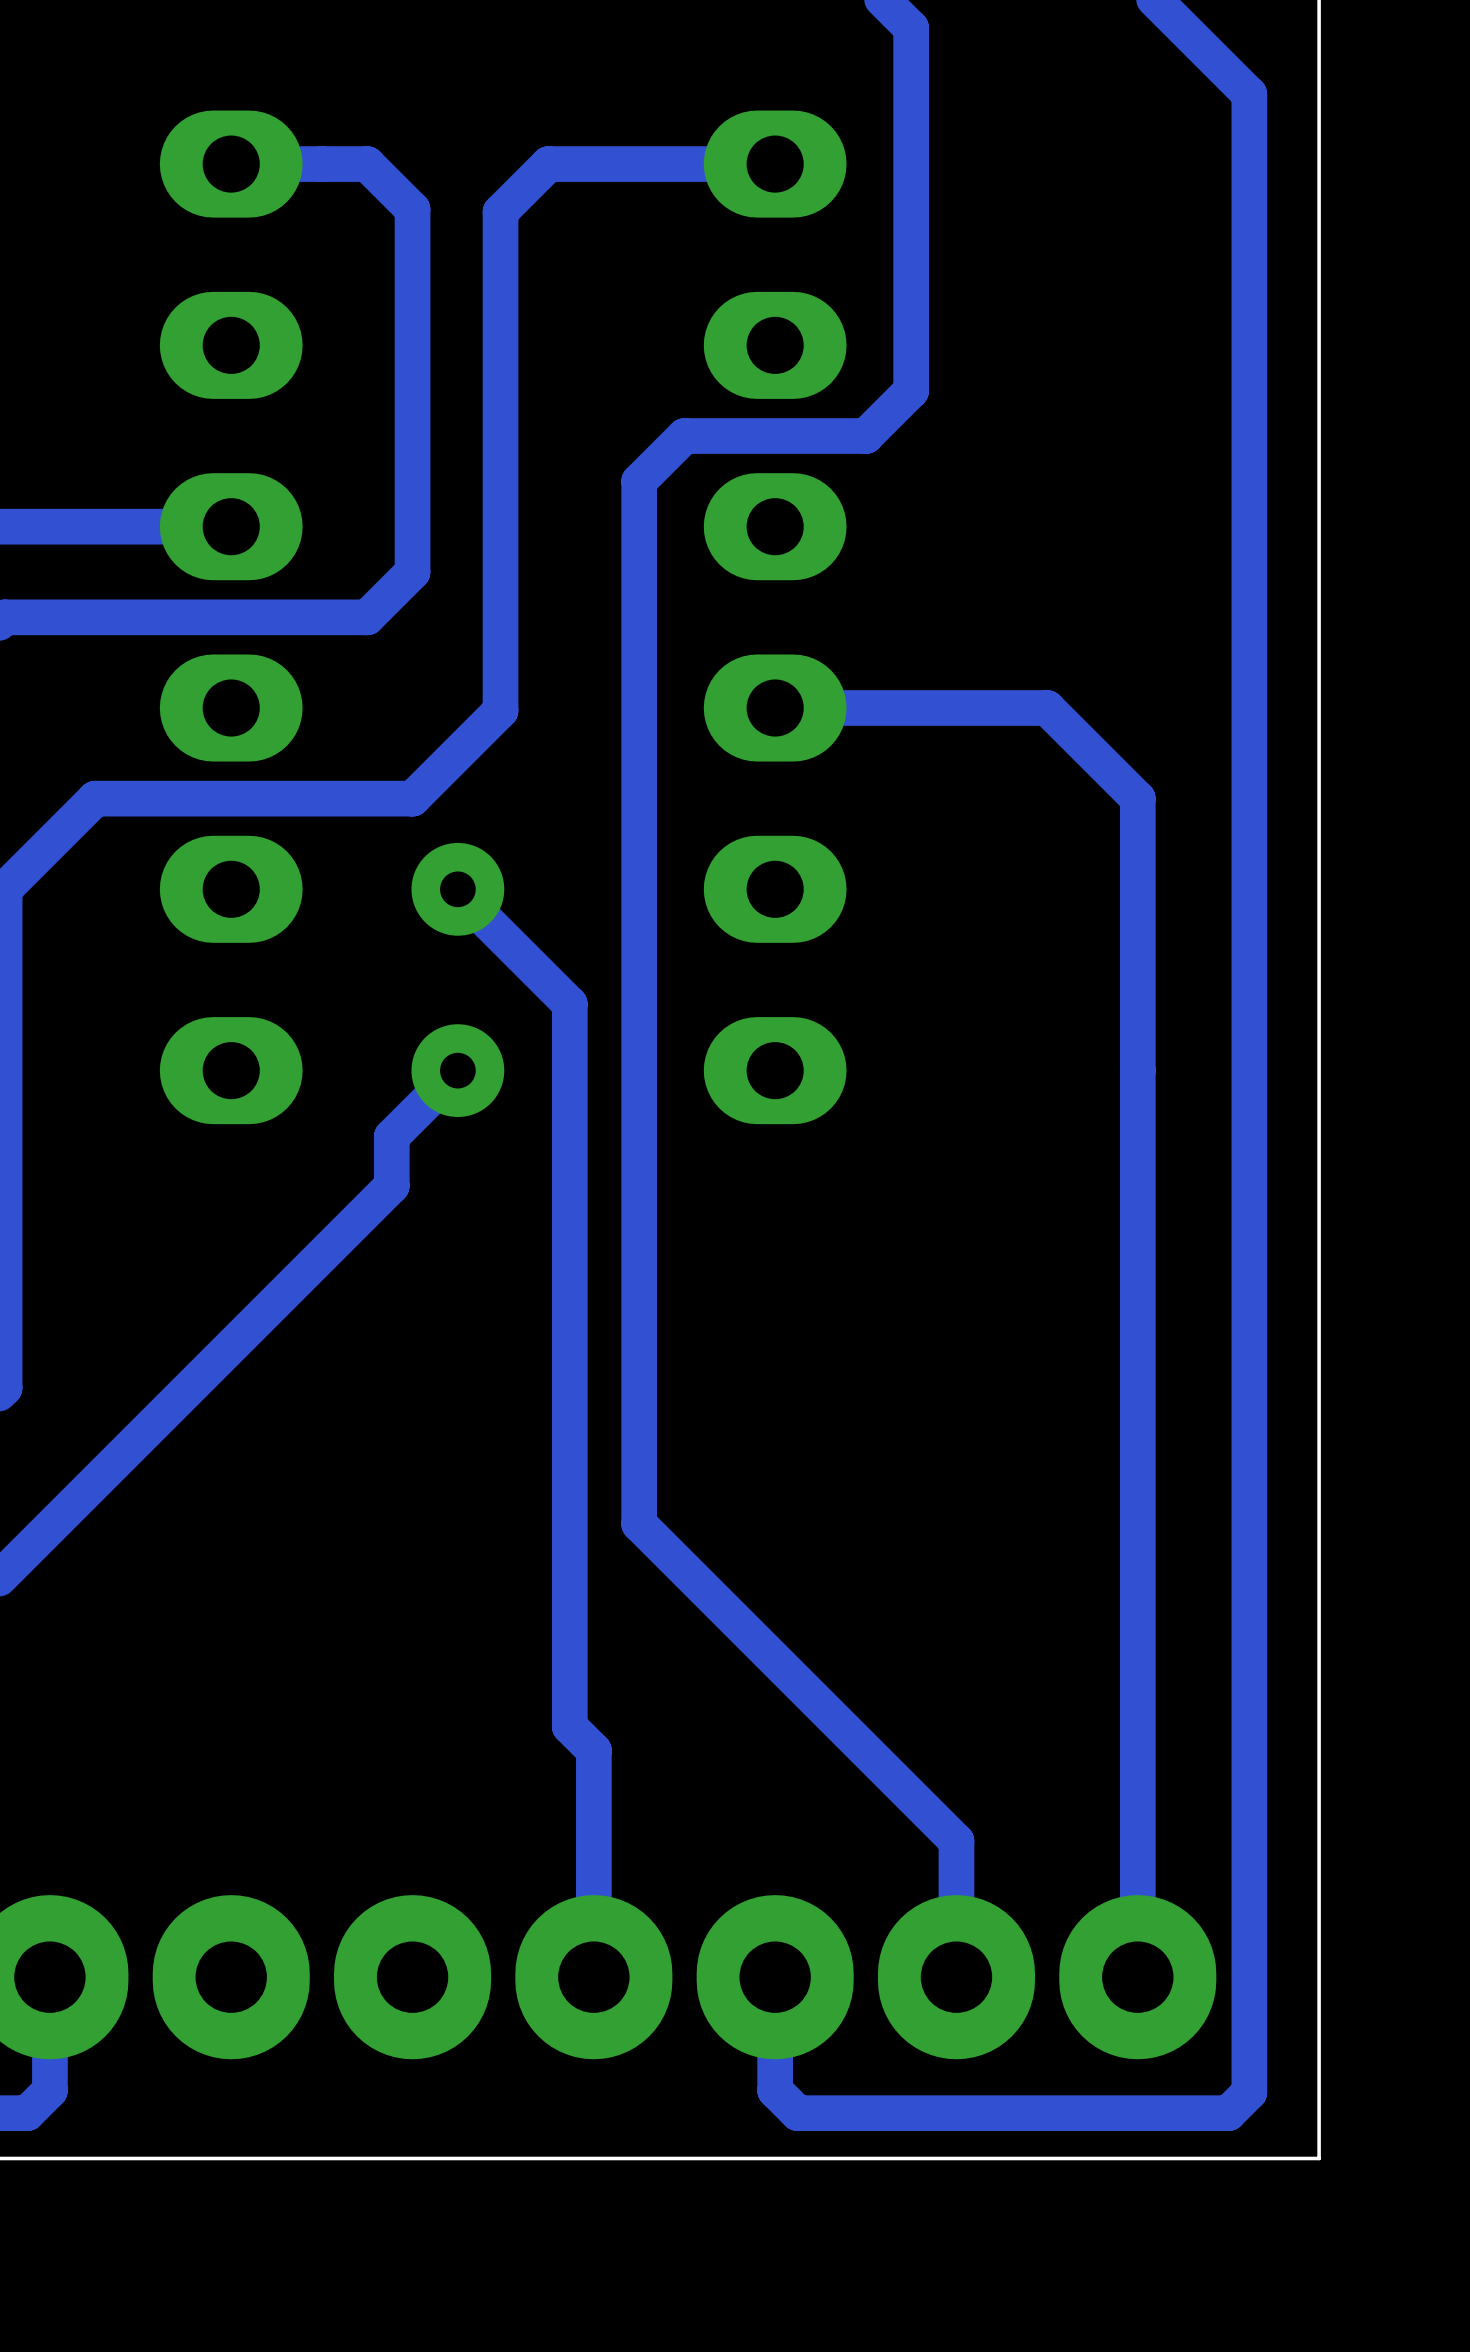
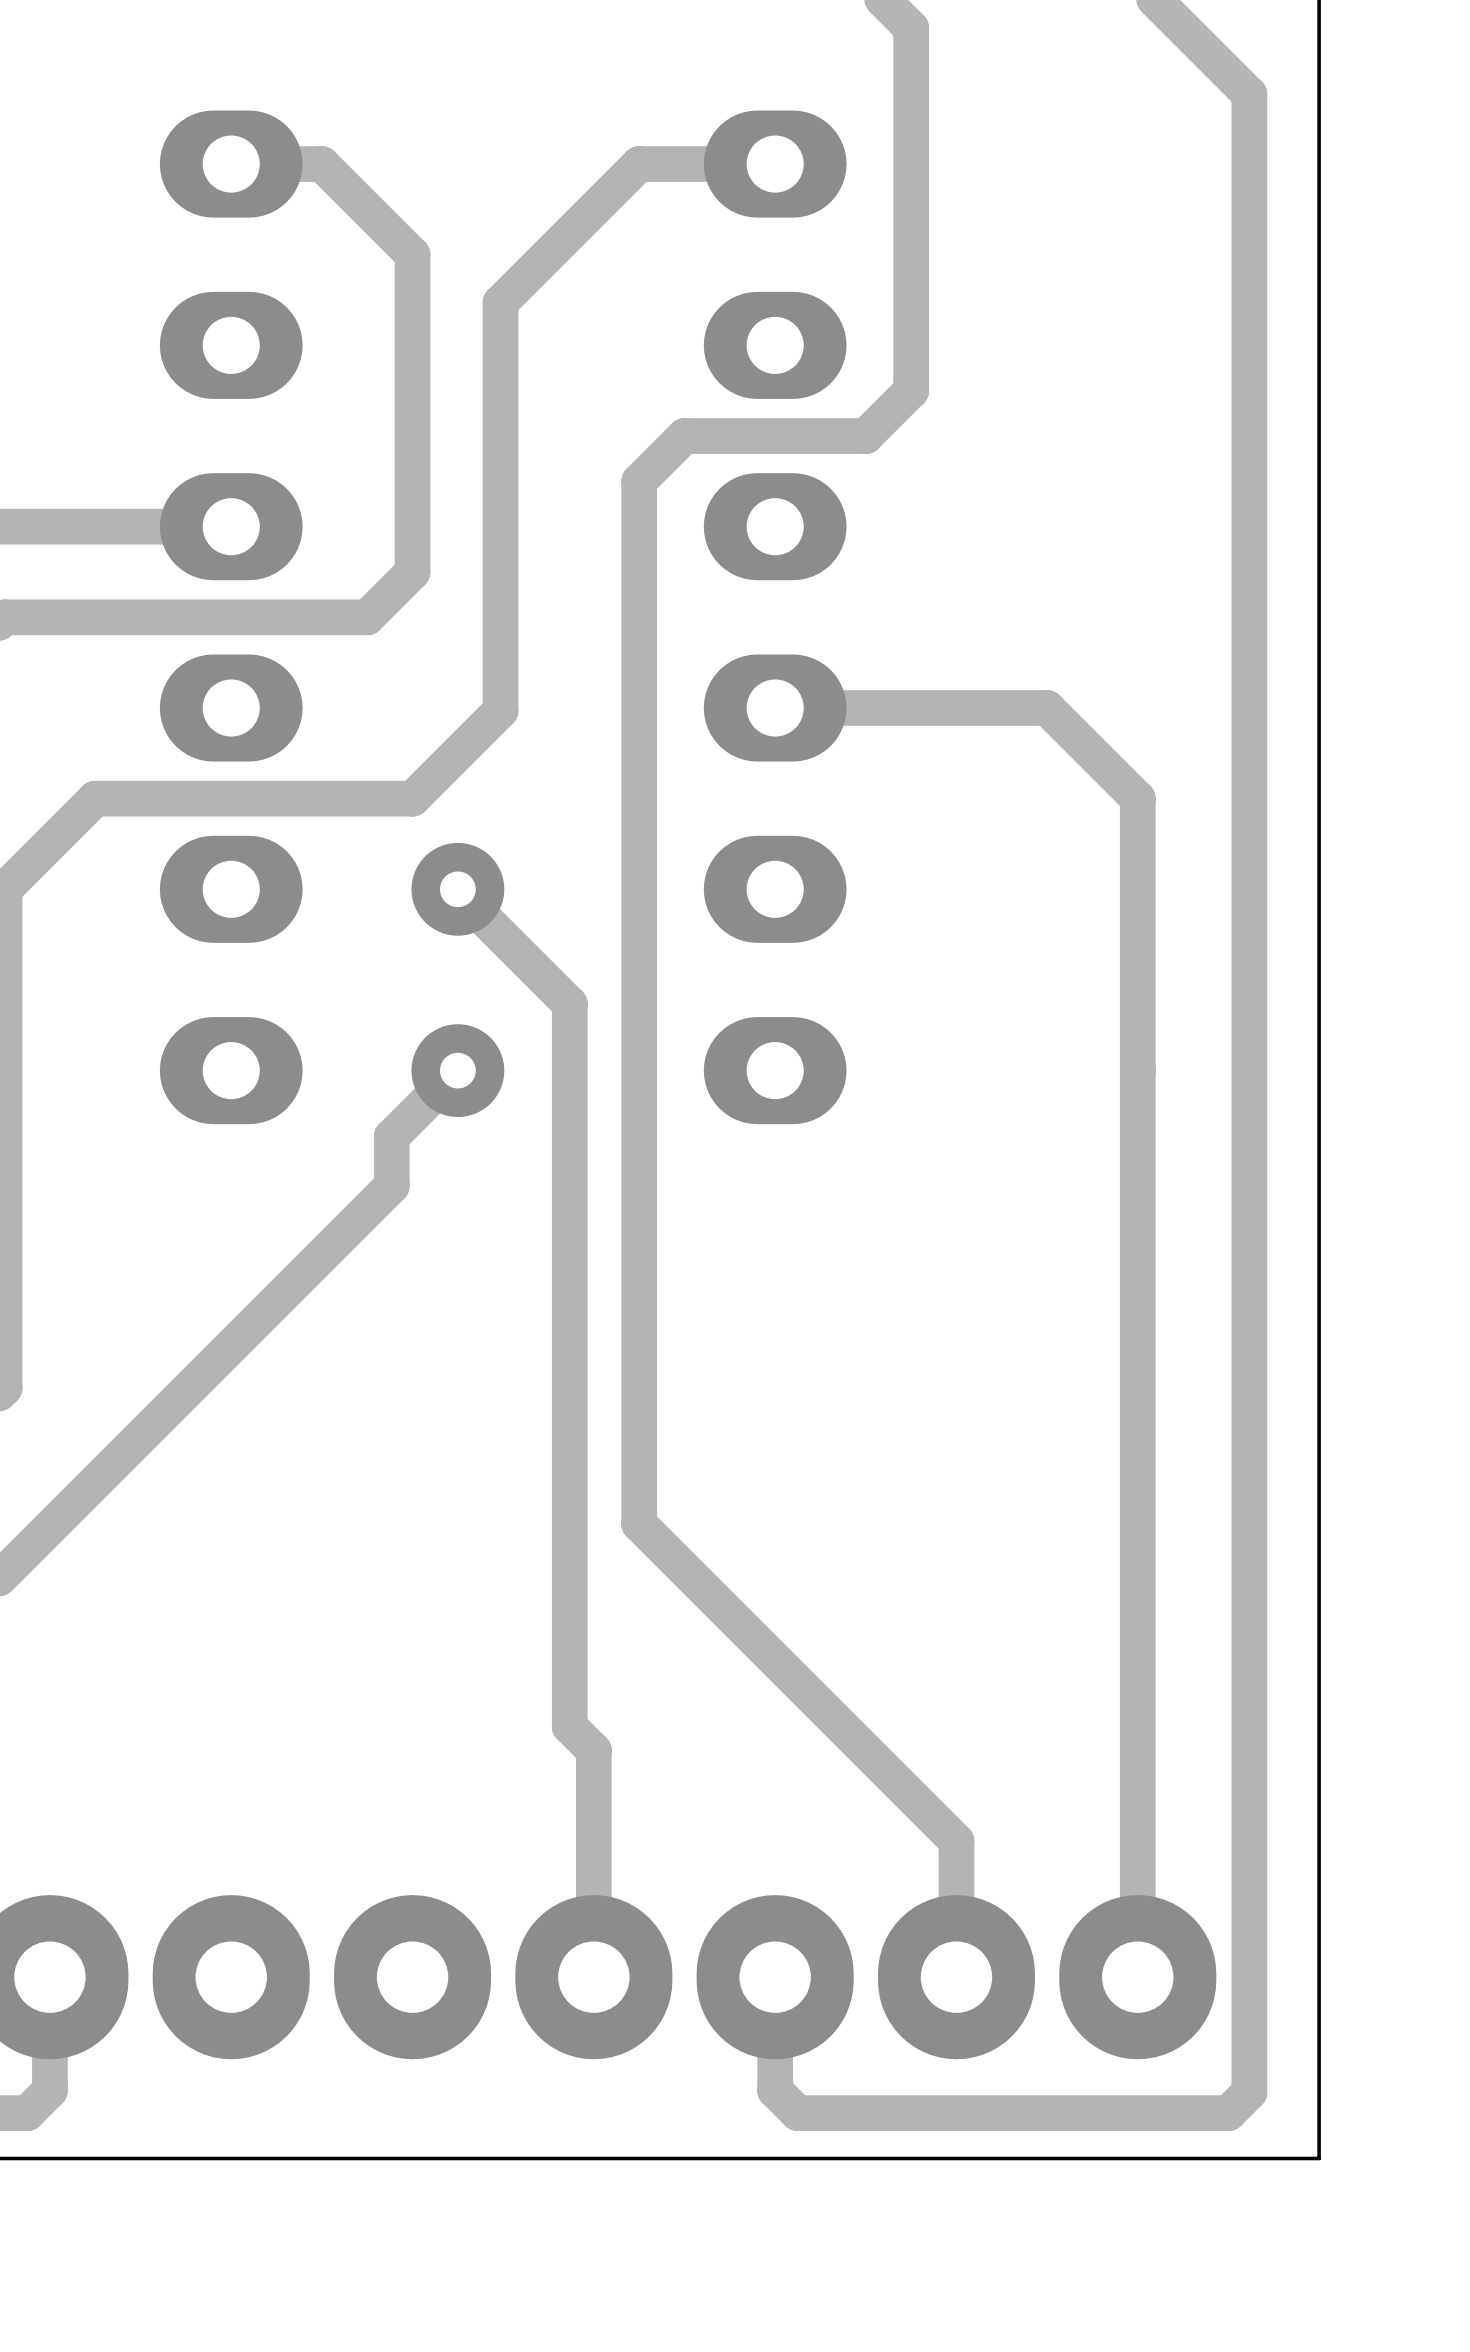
track: (321, 164) (367, 164) (412, 209) (412, 254) -> (321, 164) (412, 254)
track: (639, 164) (548, 164) (500, 212) (500, 302) -> (639, 164) (500, 302)

